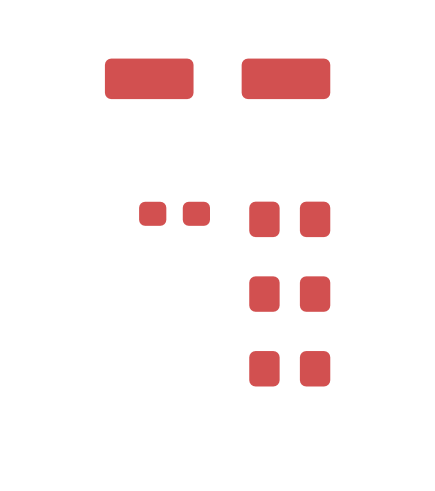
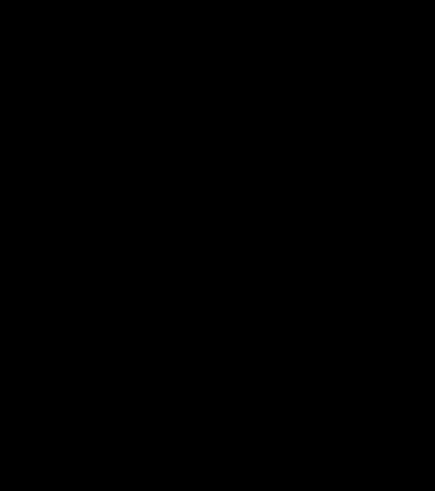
part: (217, 78) -> none
part: (174, 213) -> none
part: (289, 219) -> none
part: (289, 294) -> none
part: (289, 368) -> none

